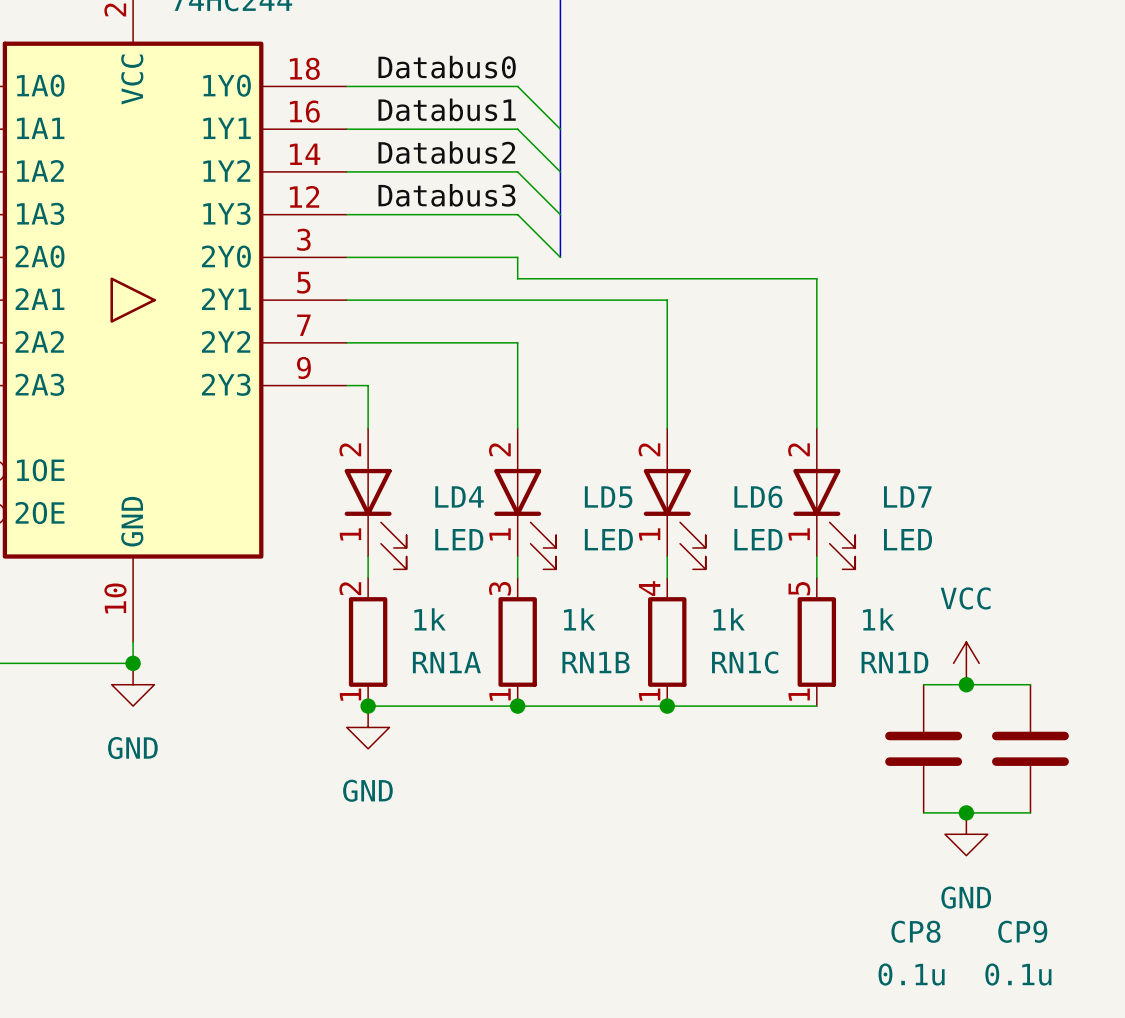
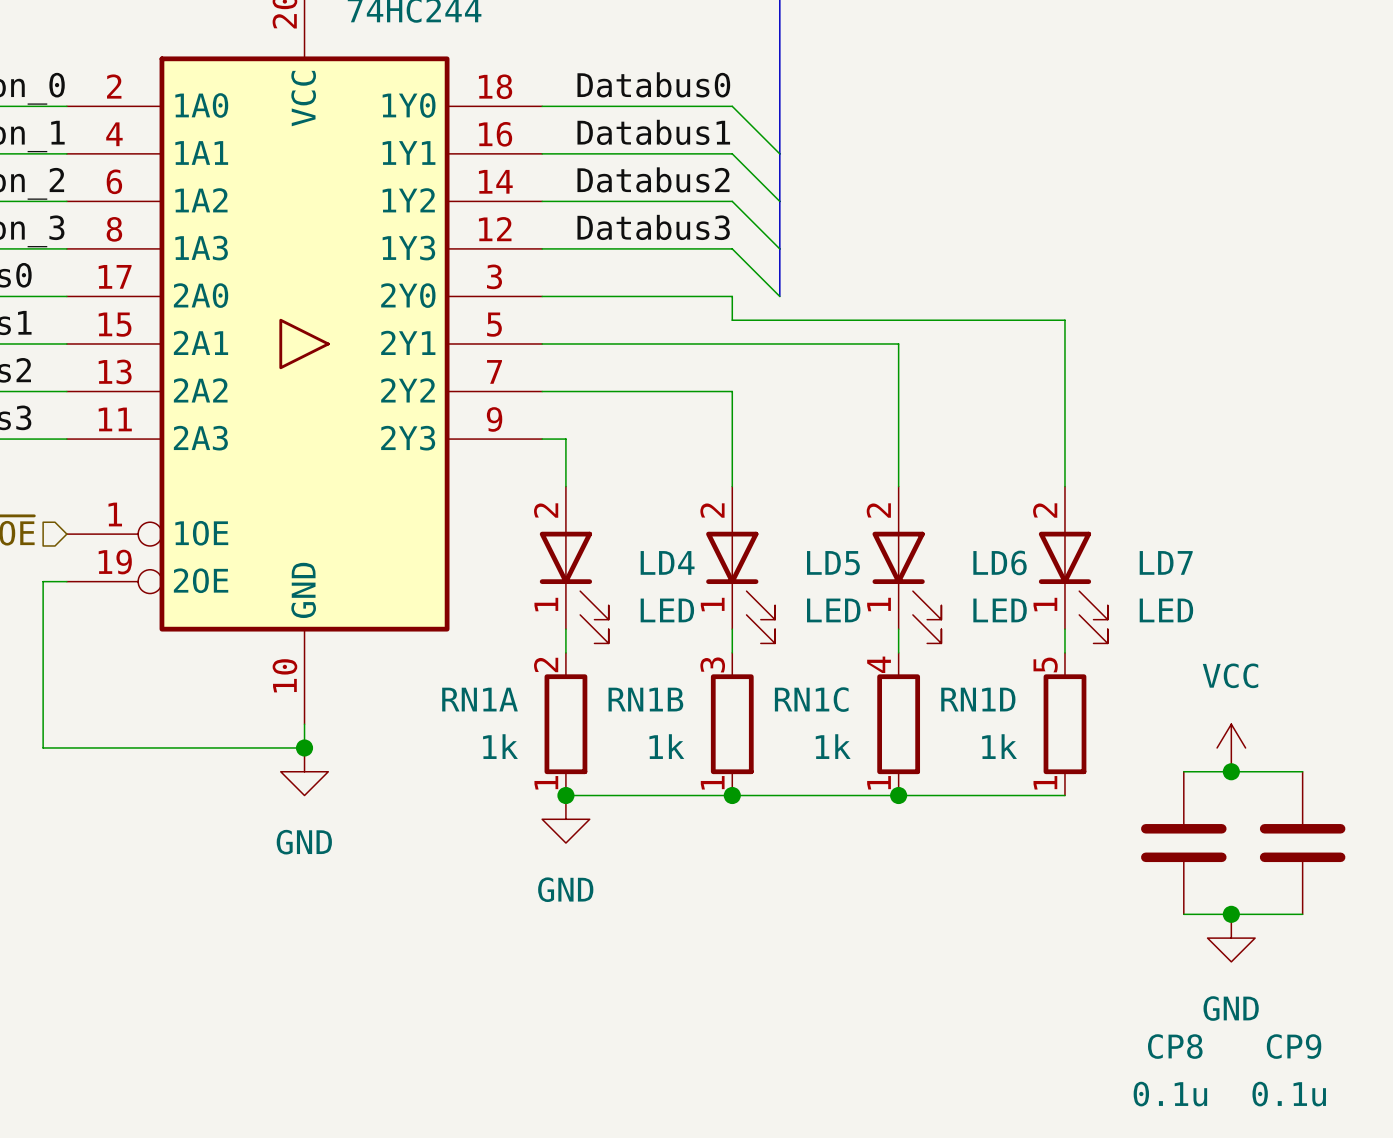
RN1A value position: 1k (430, 619) -> 1k (500, 746)
RN1B value position: 1k (579, 619) -> 1k (666, 746)
RN1C value position: 1k (729, 619) -> 1k (833, 746)
RN1D value position: 1k (878, 619) -> 1k (999, 746)
RN1A name position: RN1A (446, 662) -> RN1A (480, 699)
RN1B name position: RN1B (596, 662) -> RN1B (645, 699)
RN1C name position: RN1C (745, 662) -> RN1C (811, 699)
RN1D name position: RN1D (894, 662) -> RN1D (978, 699)

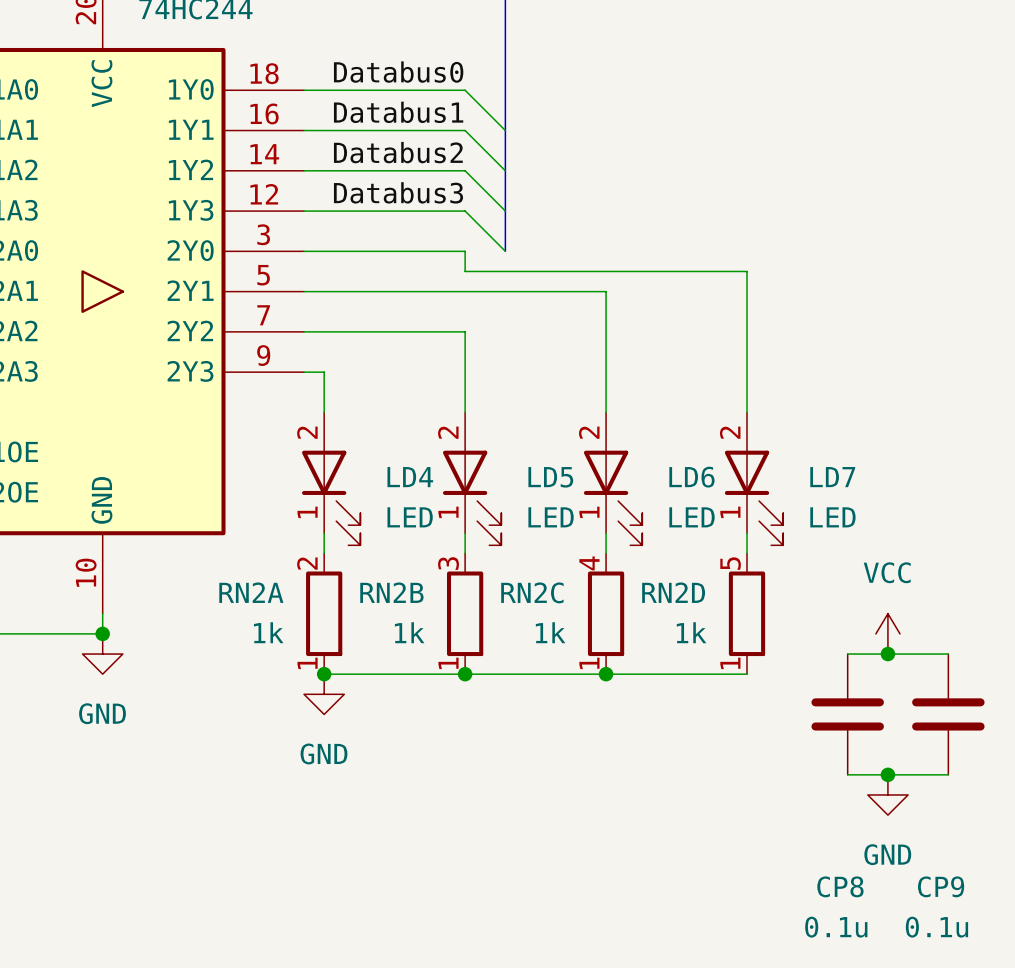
RN1A name: RN1A (480, 699) -> RN2A (251, 592)
RN1B name: RN1B (645, 699) -> RN2B (391, 592)
RN1C name: RN1C (811, 699) -> RN2C (532, 592)
RN1D name: RN1D (978, 699) -> RN2D (673, 592)

